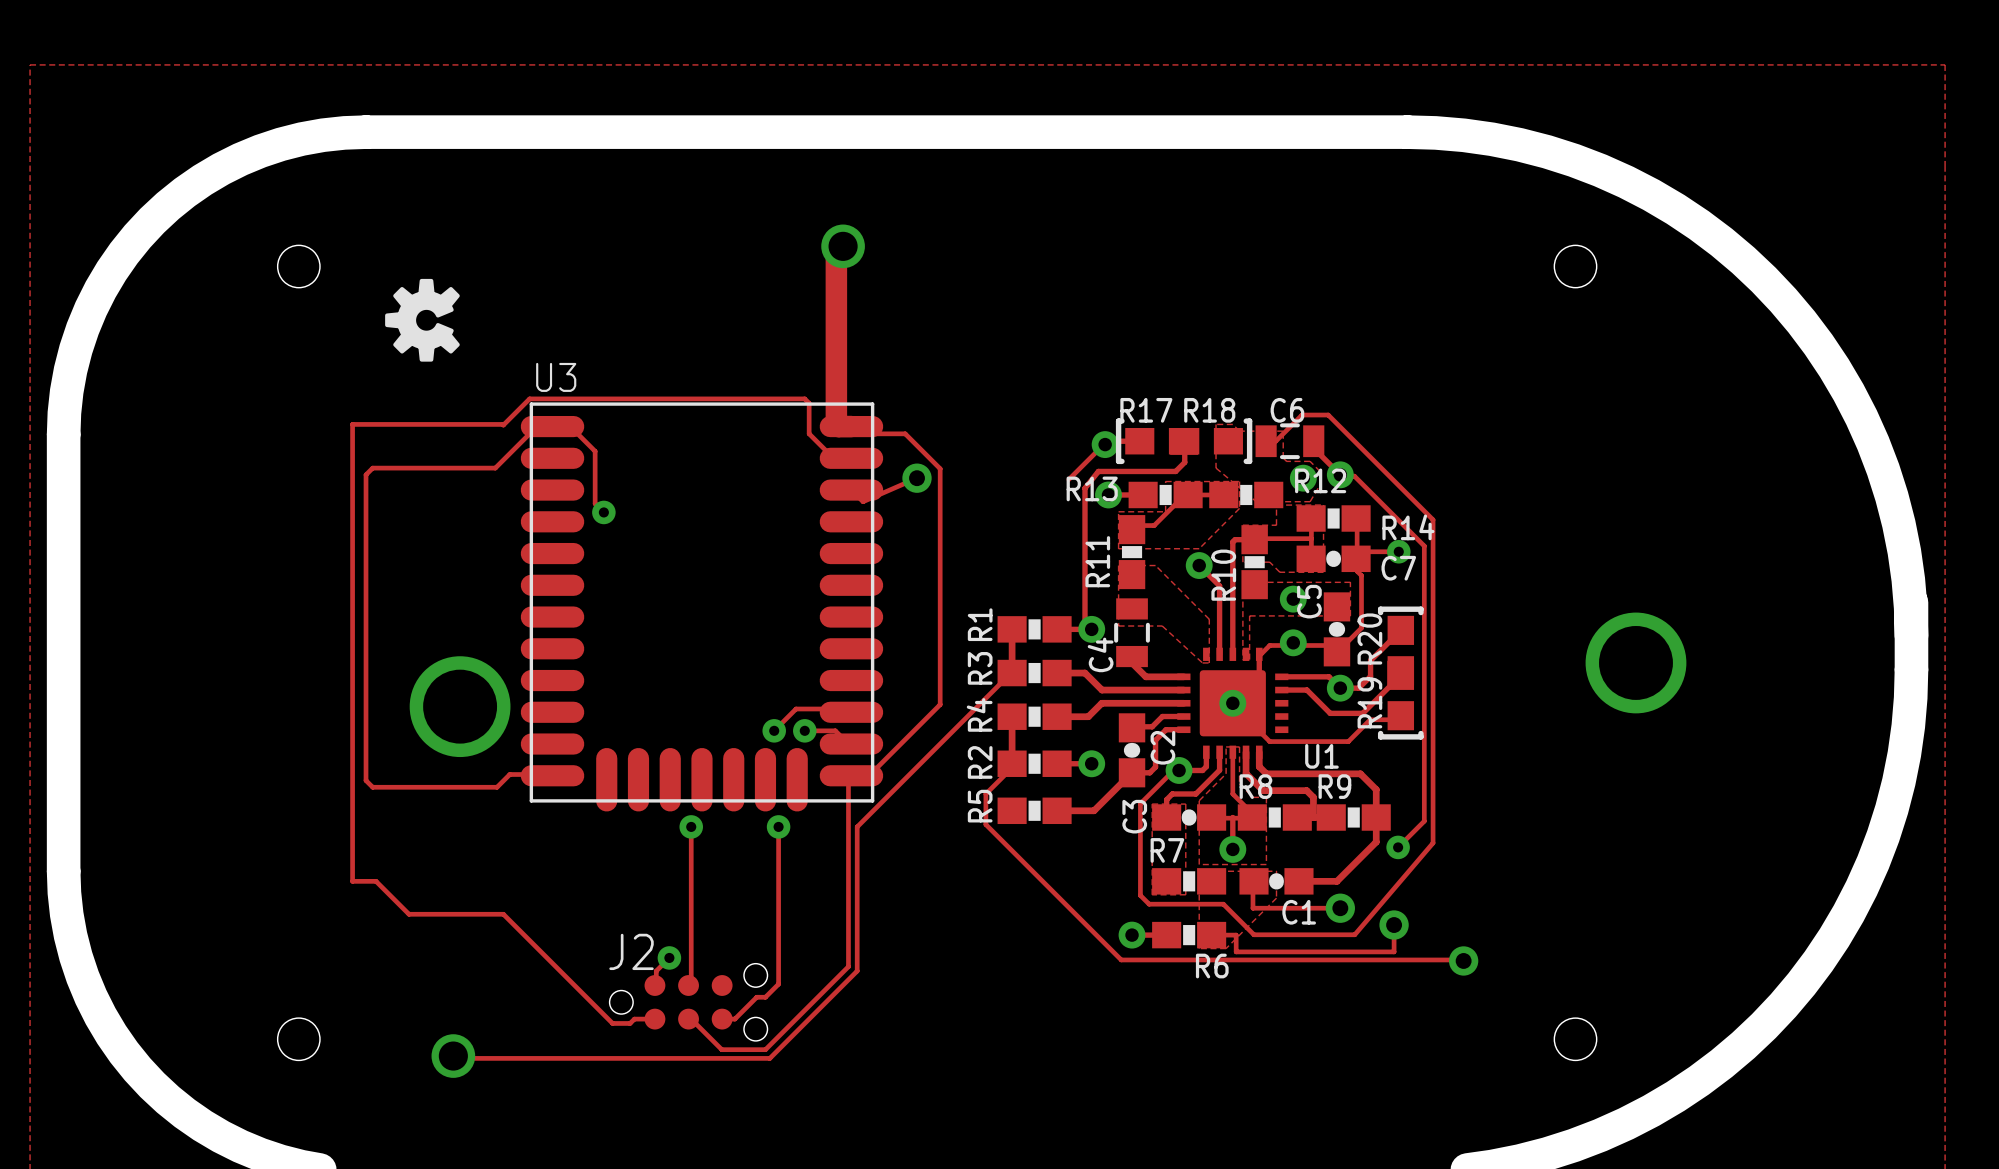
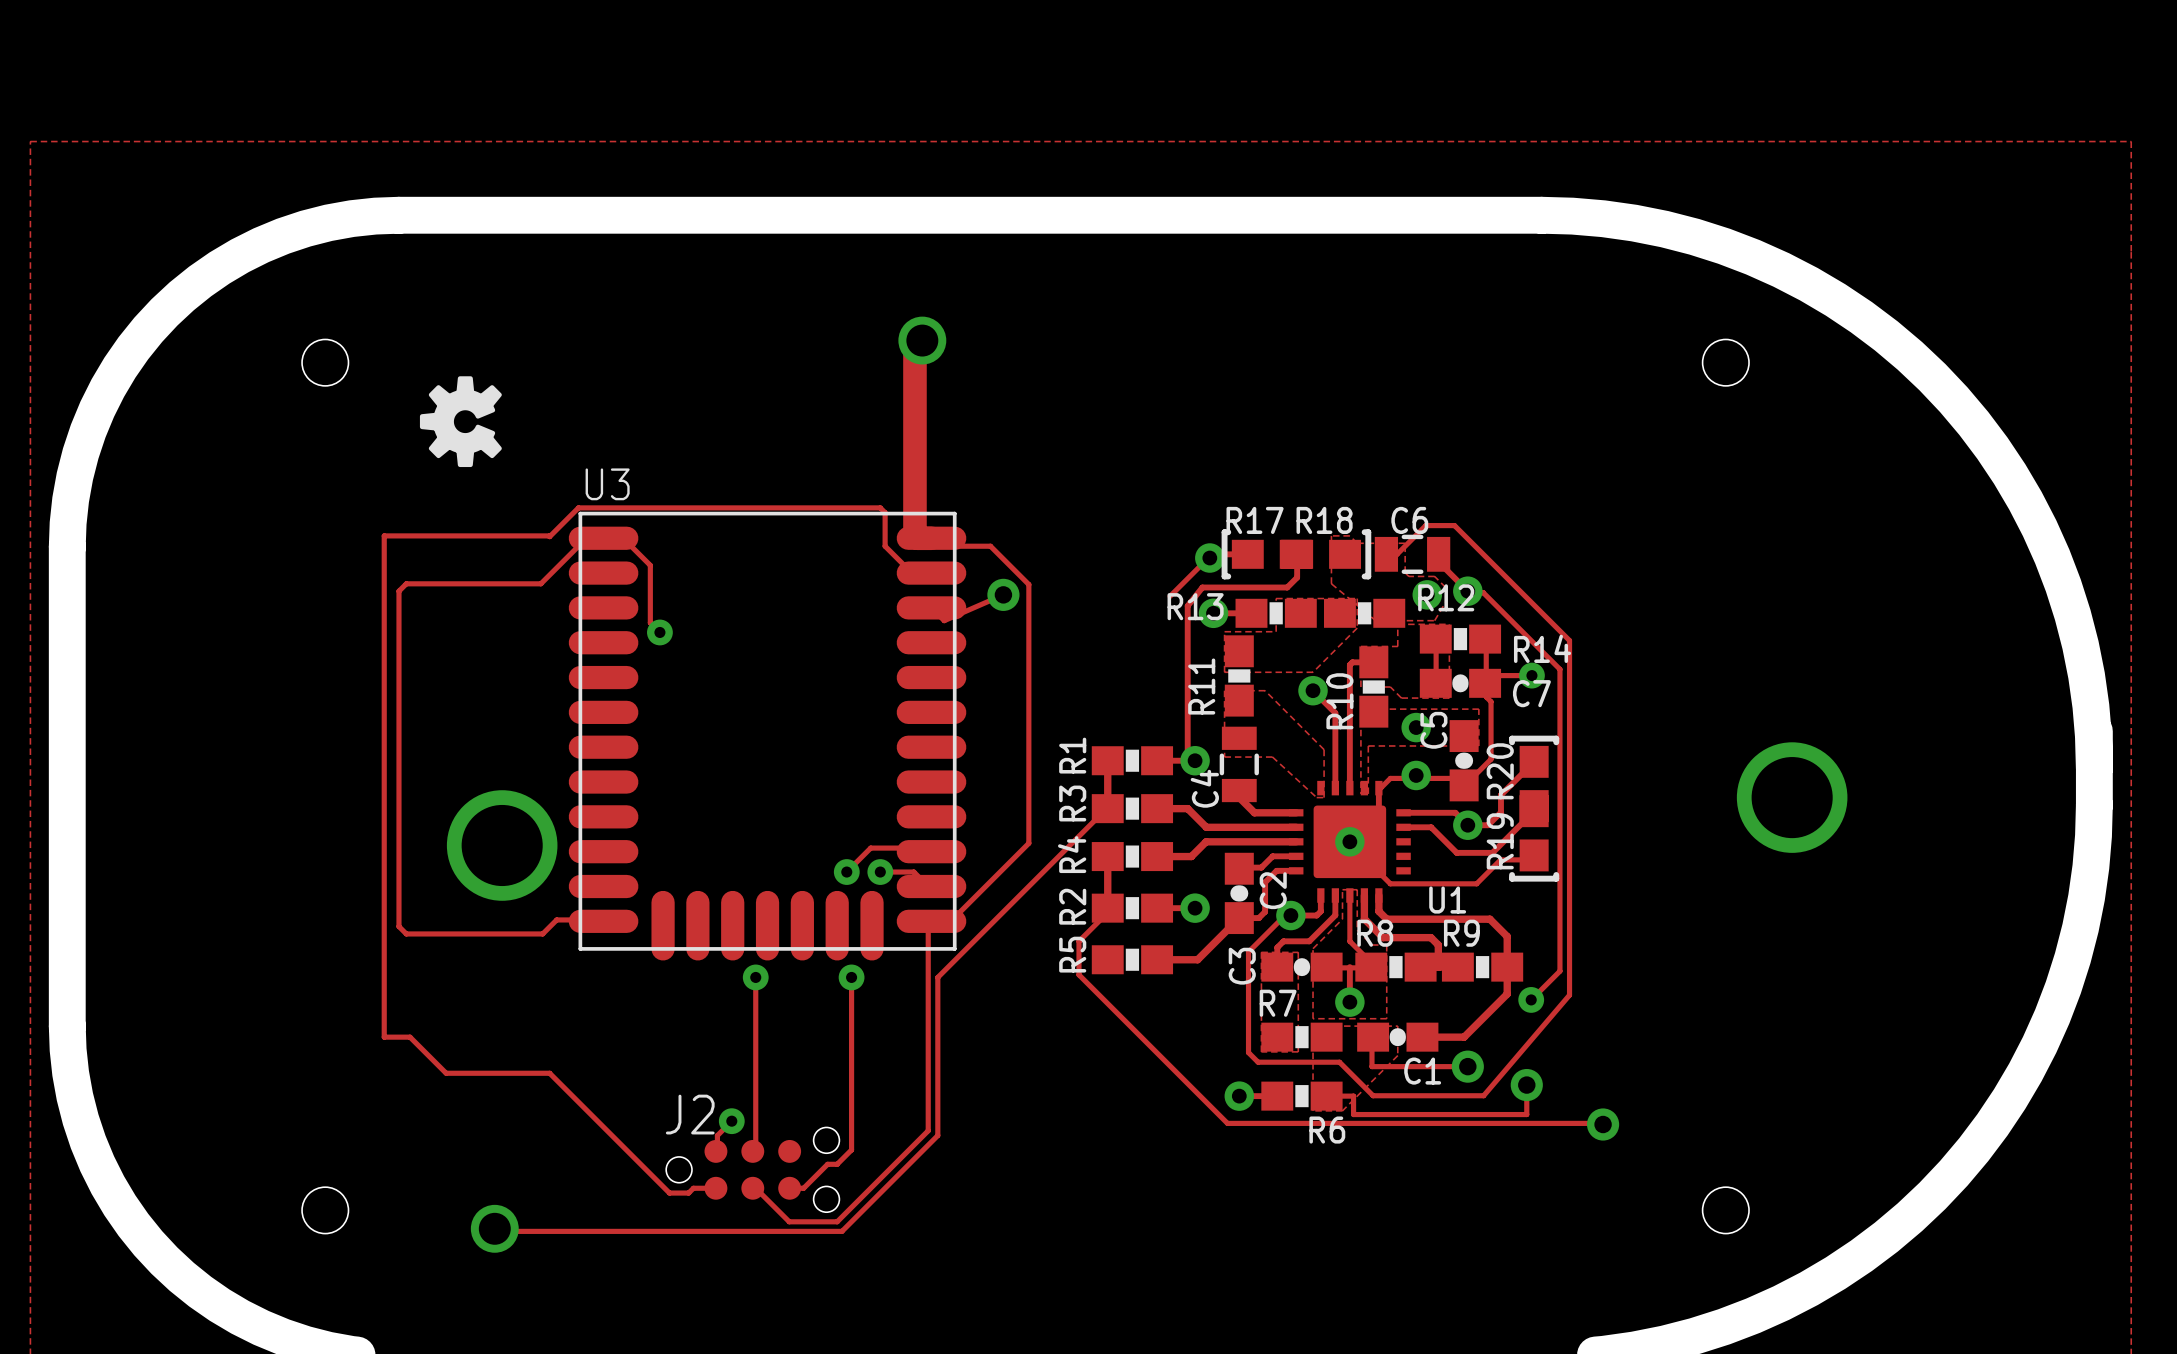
track: (1224, 494) (1184, 494) (1154, 525) (1132, 525) (1132, 529) -> none
track: (1311, 538) (1254, 539) -> none

